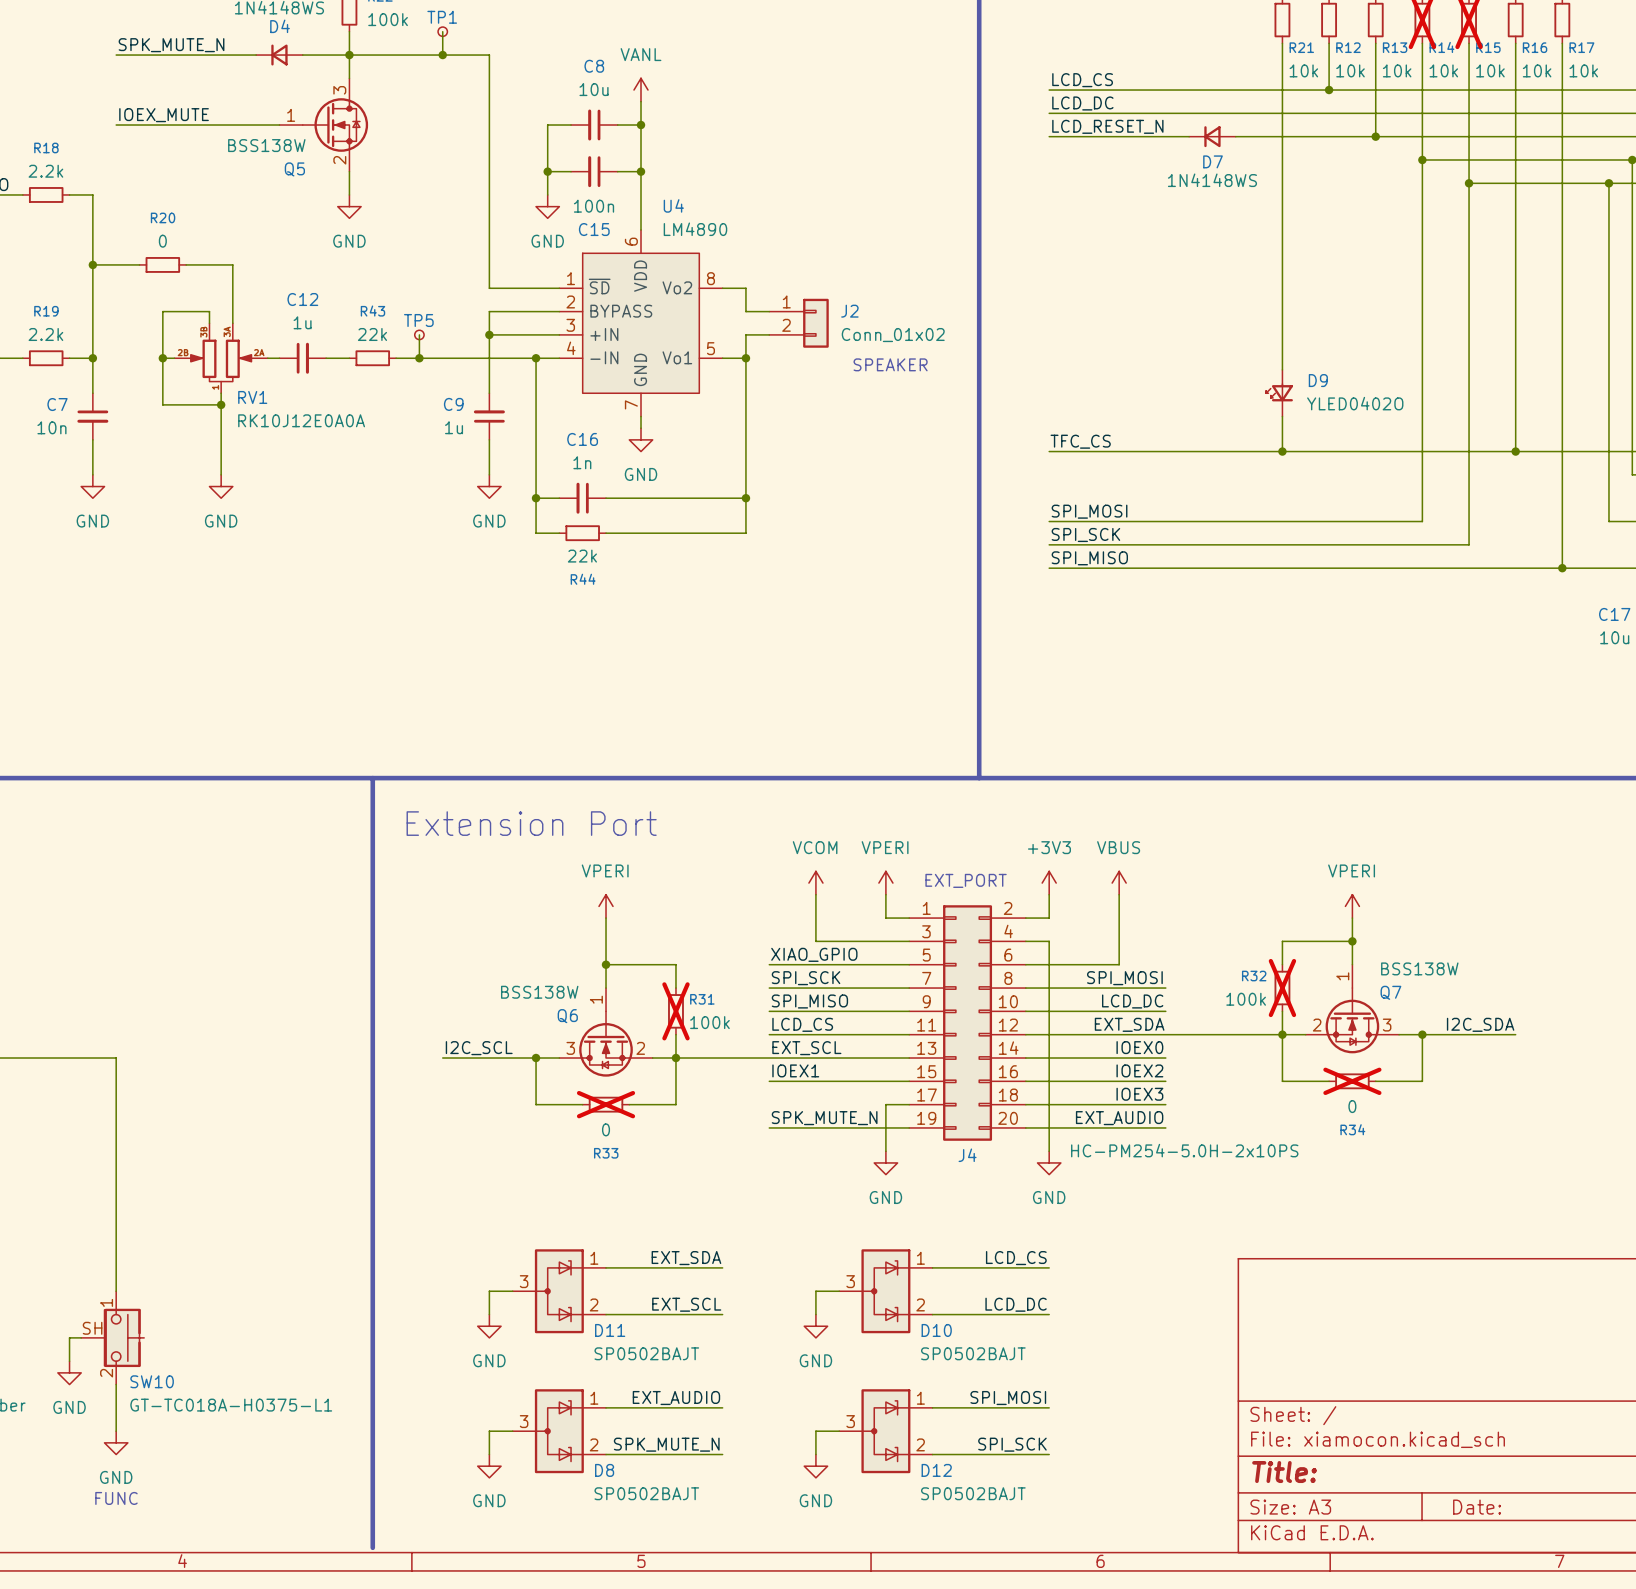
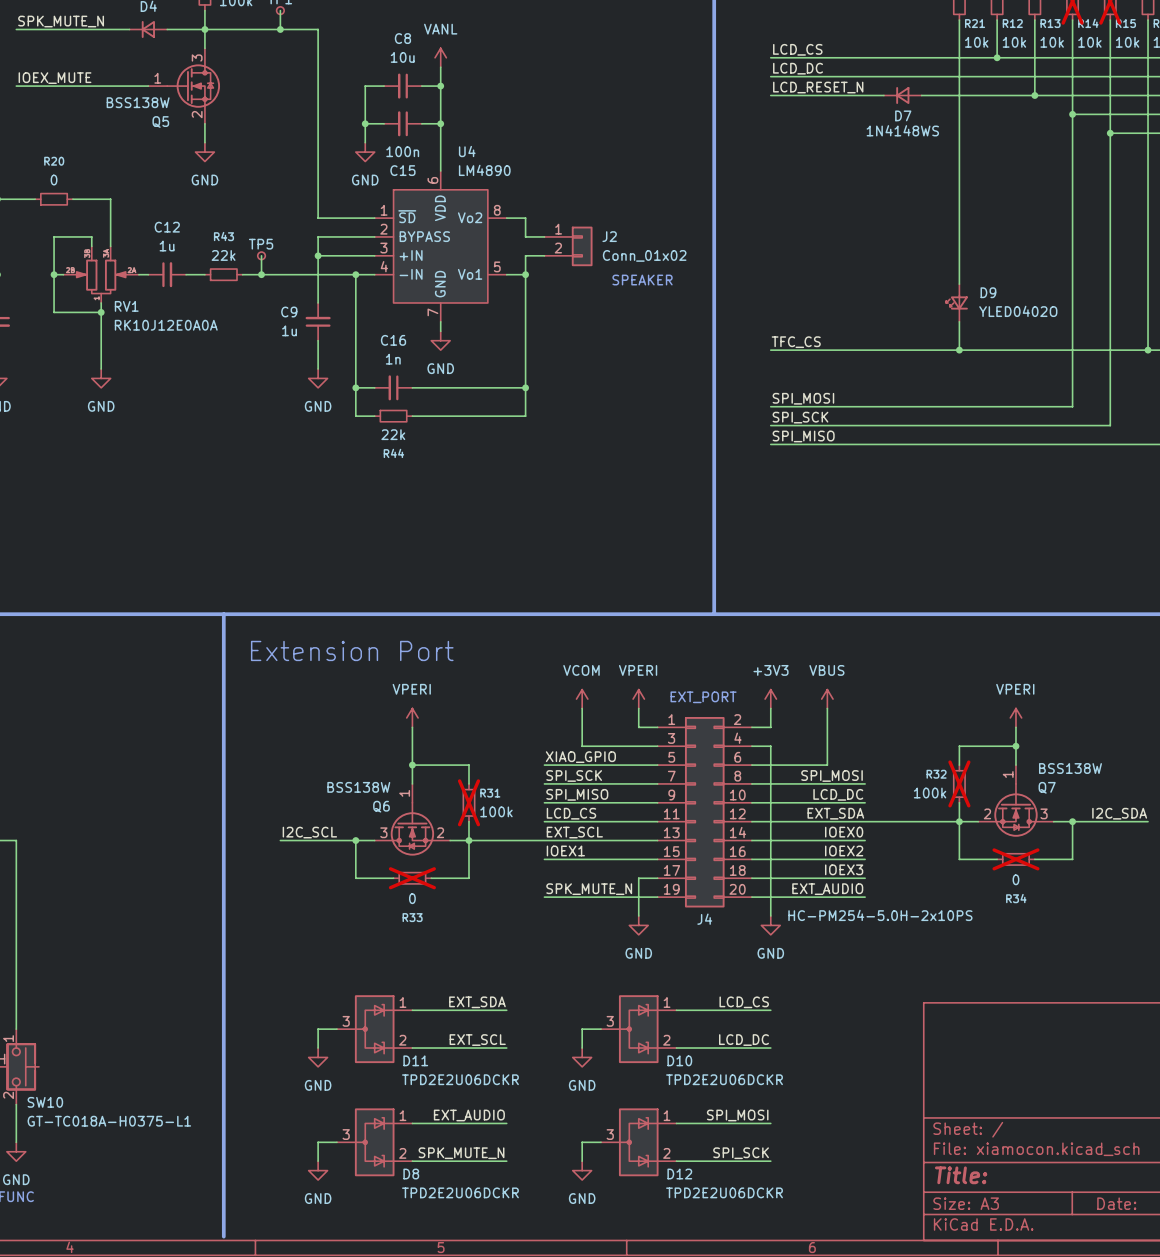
D11 value: SP0502BAJT (646, 1353) -> TPD2E2U06DCKR (460, 1079)
D10 value: SP0502BAJT (973, 1353) -> TPD2E2U06DCKR (724, 1079)
D8 value: SP0502BAJT (646, 1493) -> TPD2E2U06DCKR (460, 1192)
D12 value: SP0502BAJT (973, 1493) -> TPD2E2U06DCKR (724, 1192)

